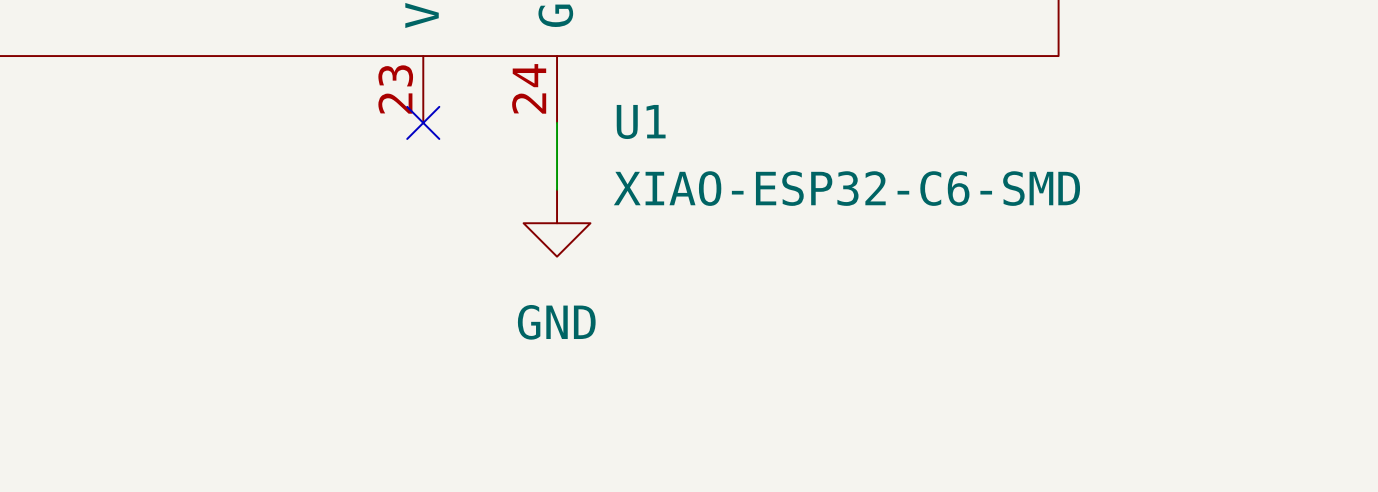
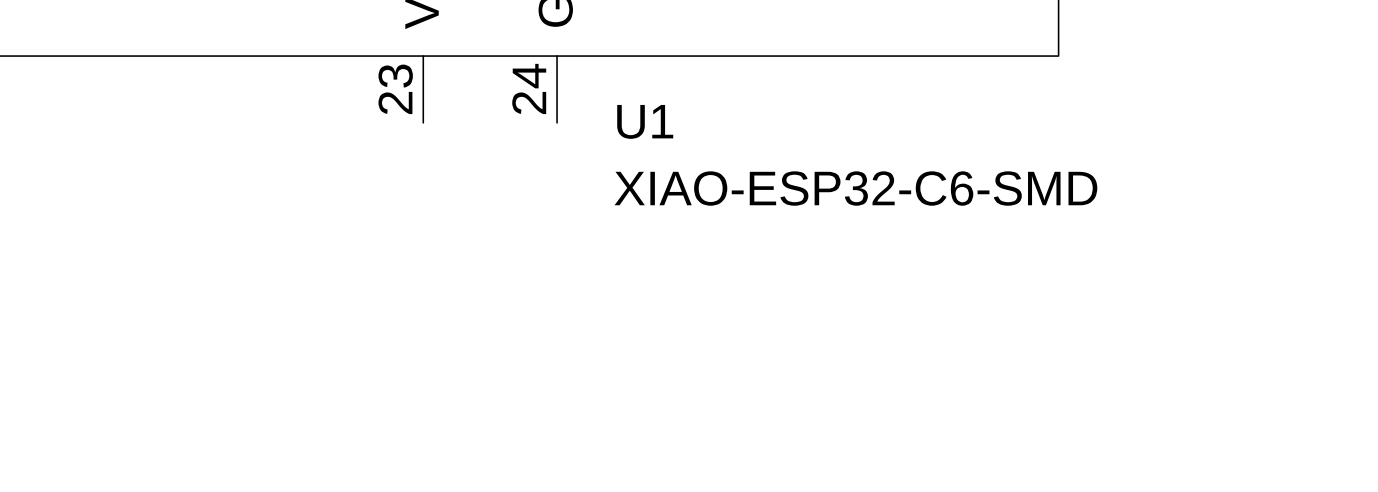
no-connect mark: (423, 122) -> none
wire: (557, 122) (557, 189) -> none
power symbol: GND (557, 223) -> none

